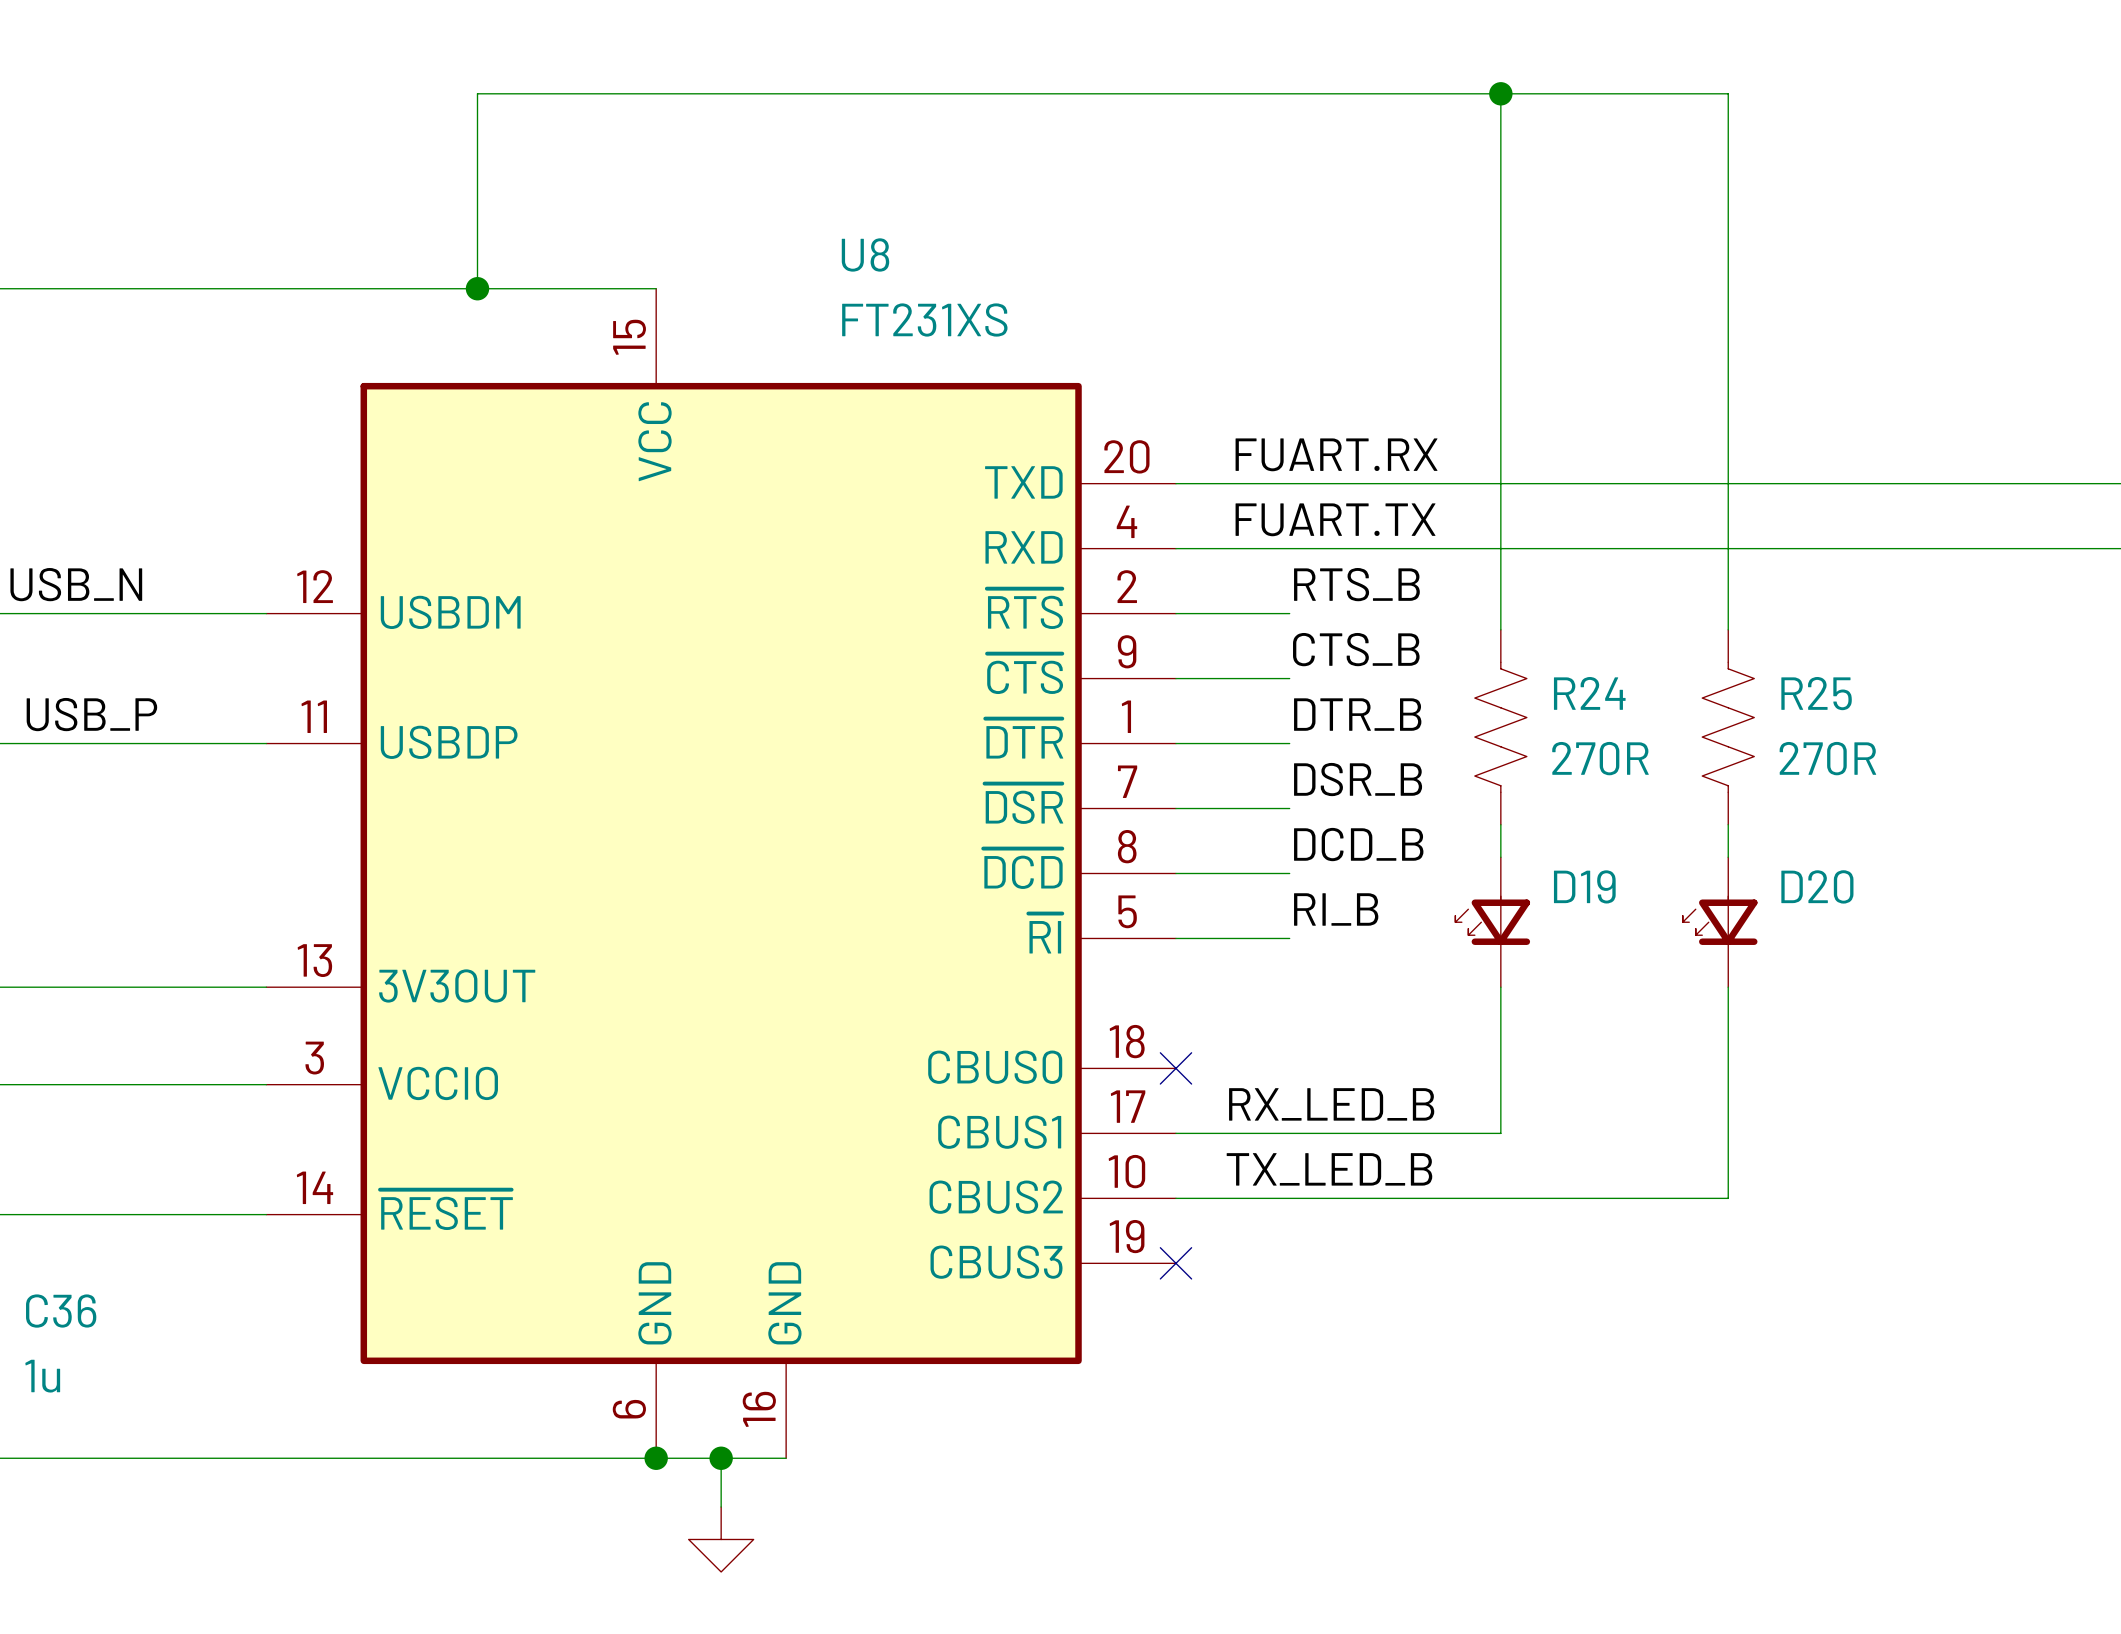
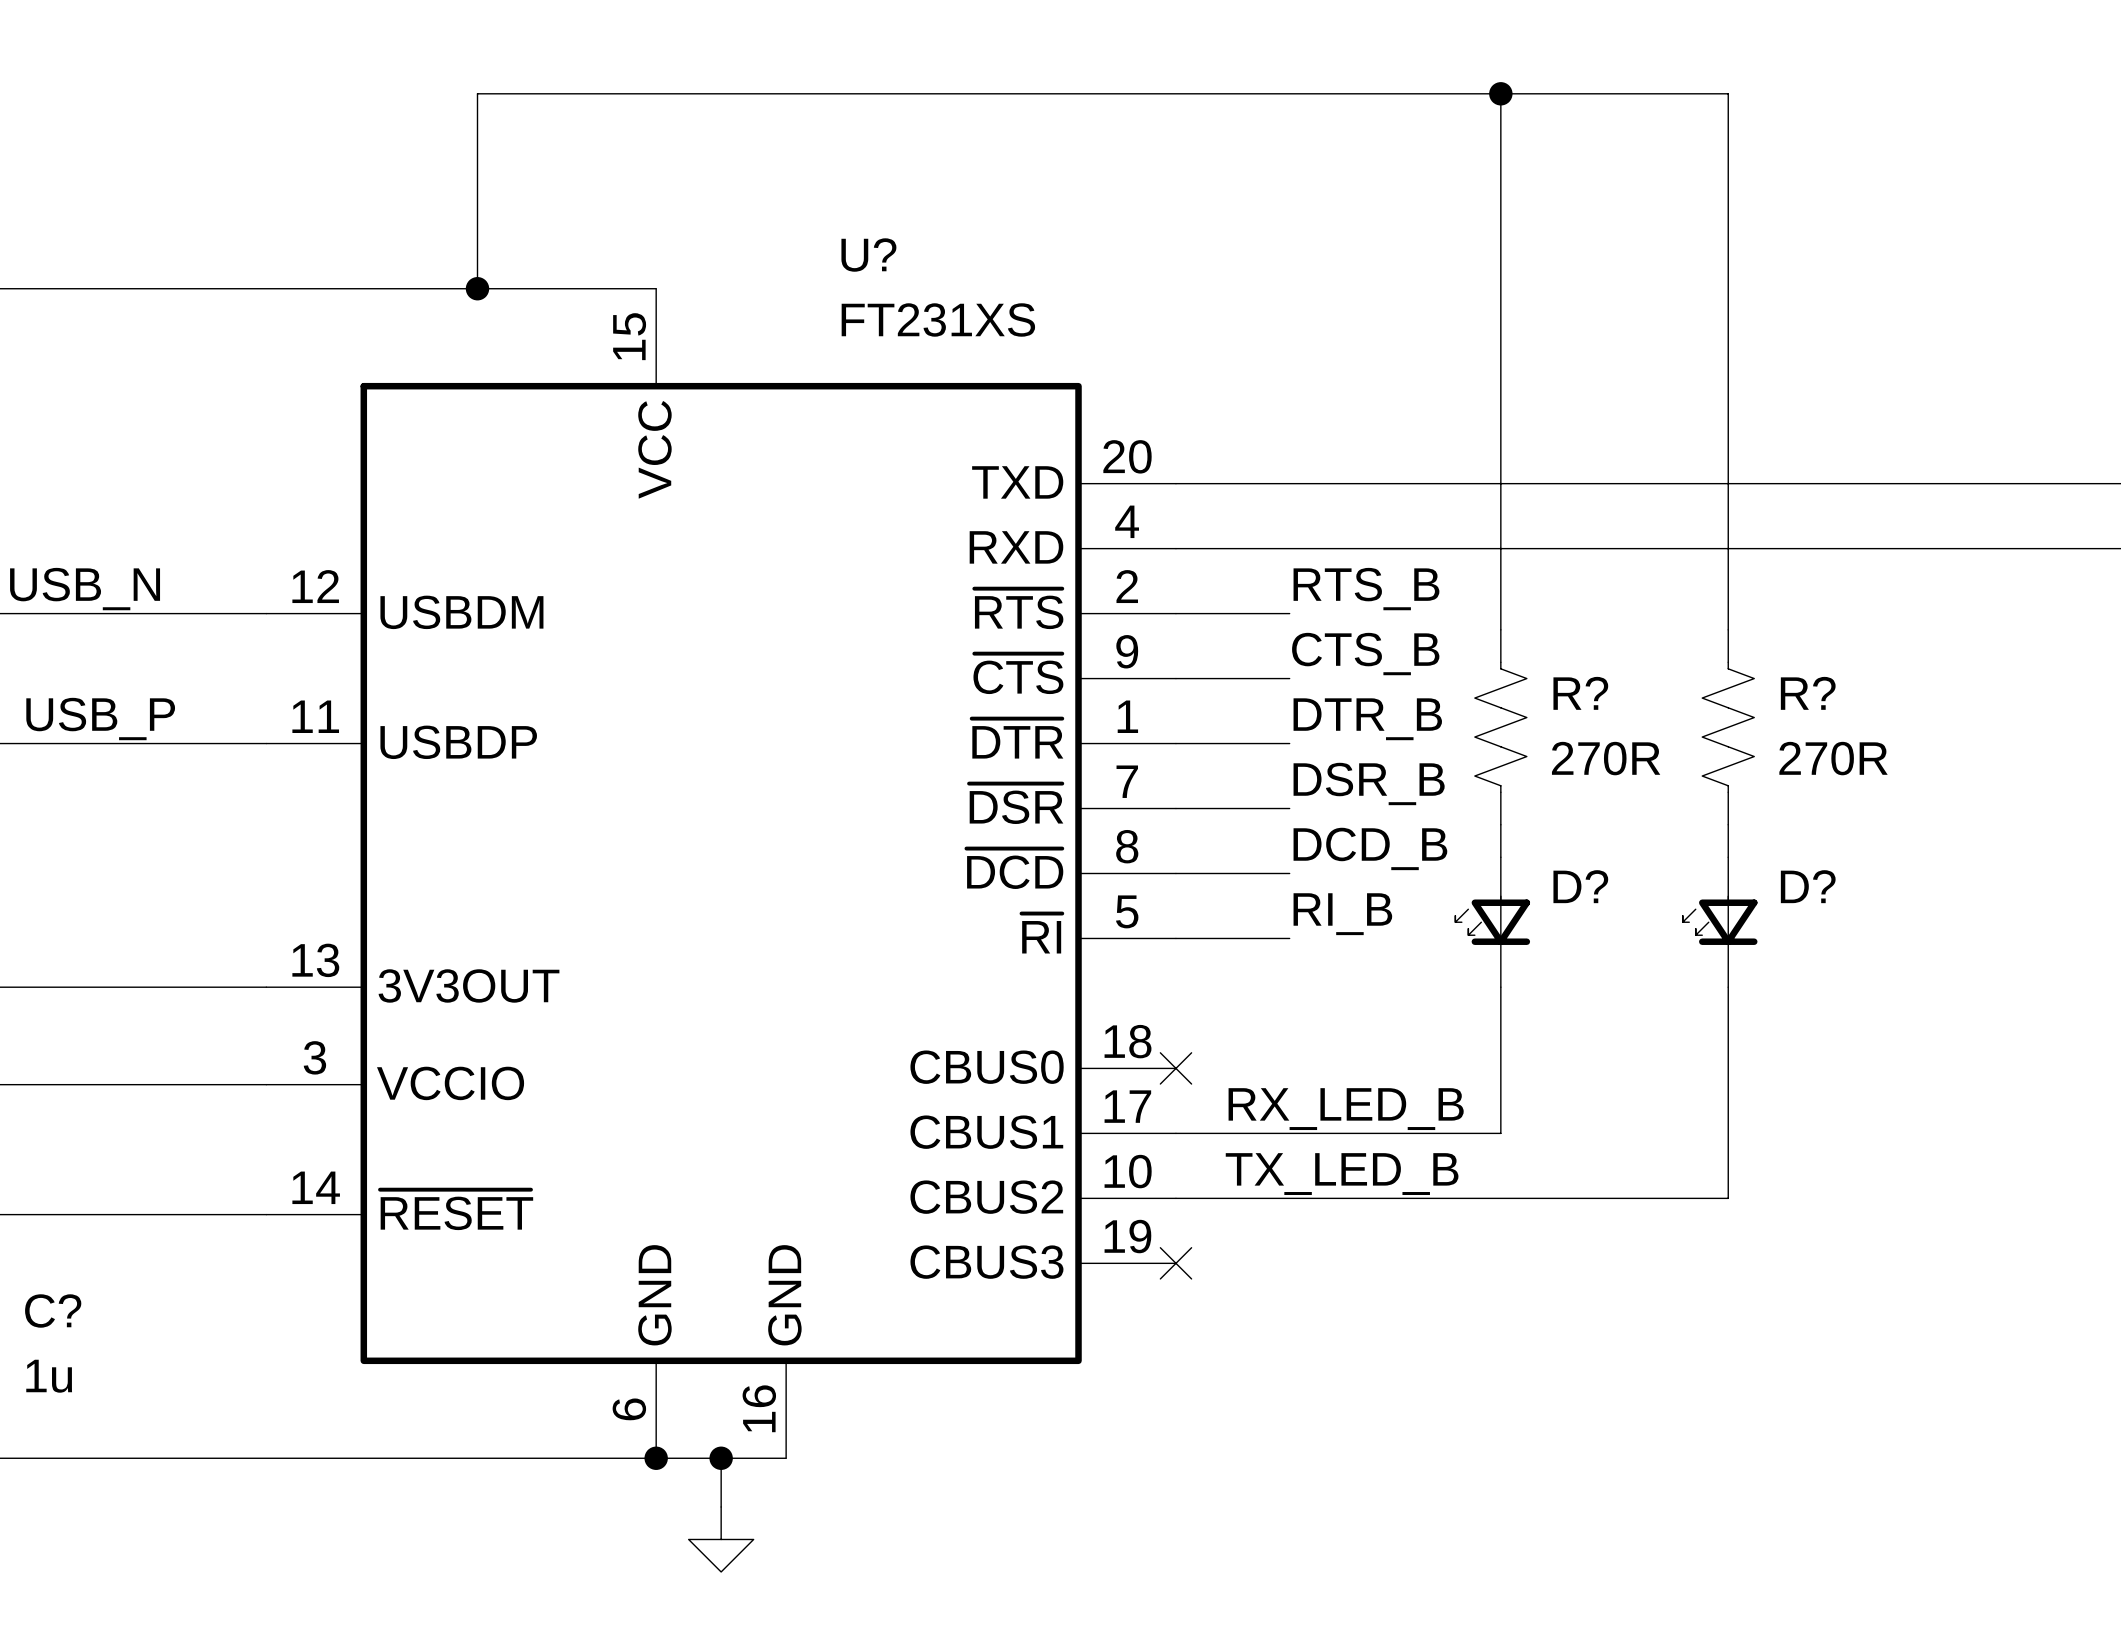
U8 name: U8 (865, 254) -> U? (868, 255)
label: FUART.RX (1336, 454) -> none
label: FUART.TX (1335, 519) -> none
R24 name: R24 (1589, 693) -> R? (1580, 693)
R25 name: R25 (1816, 693) -> R? (1808, 693)
D19 name: D19 (1584, 886) -> D? (1580, 886)
D20 name: D20 (1817, 886) -> D? (1808, 886)
C36 name: C36 (61, 1311) -> C? (53, 1311)

